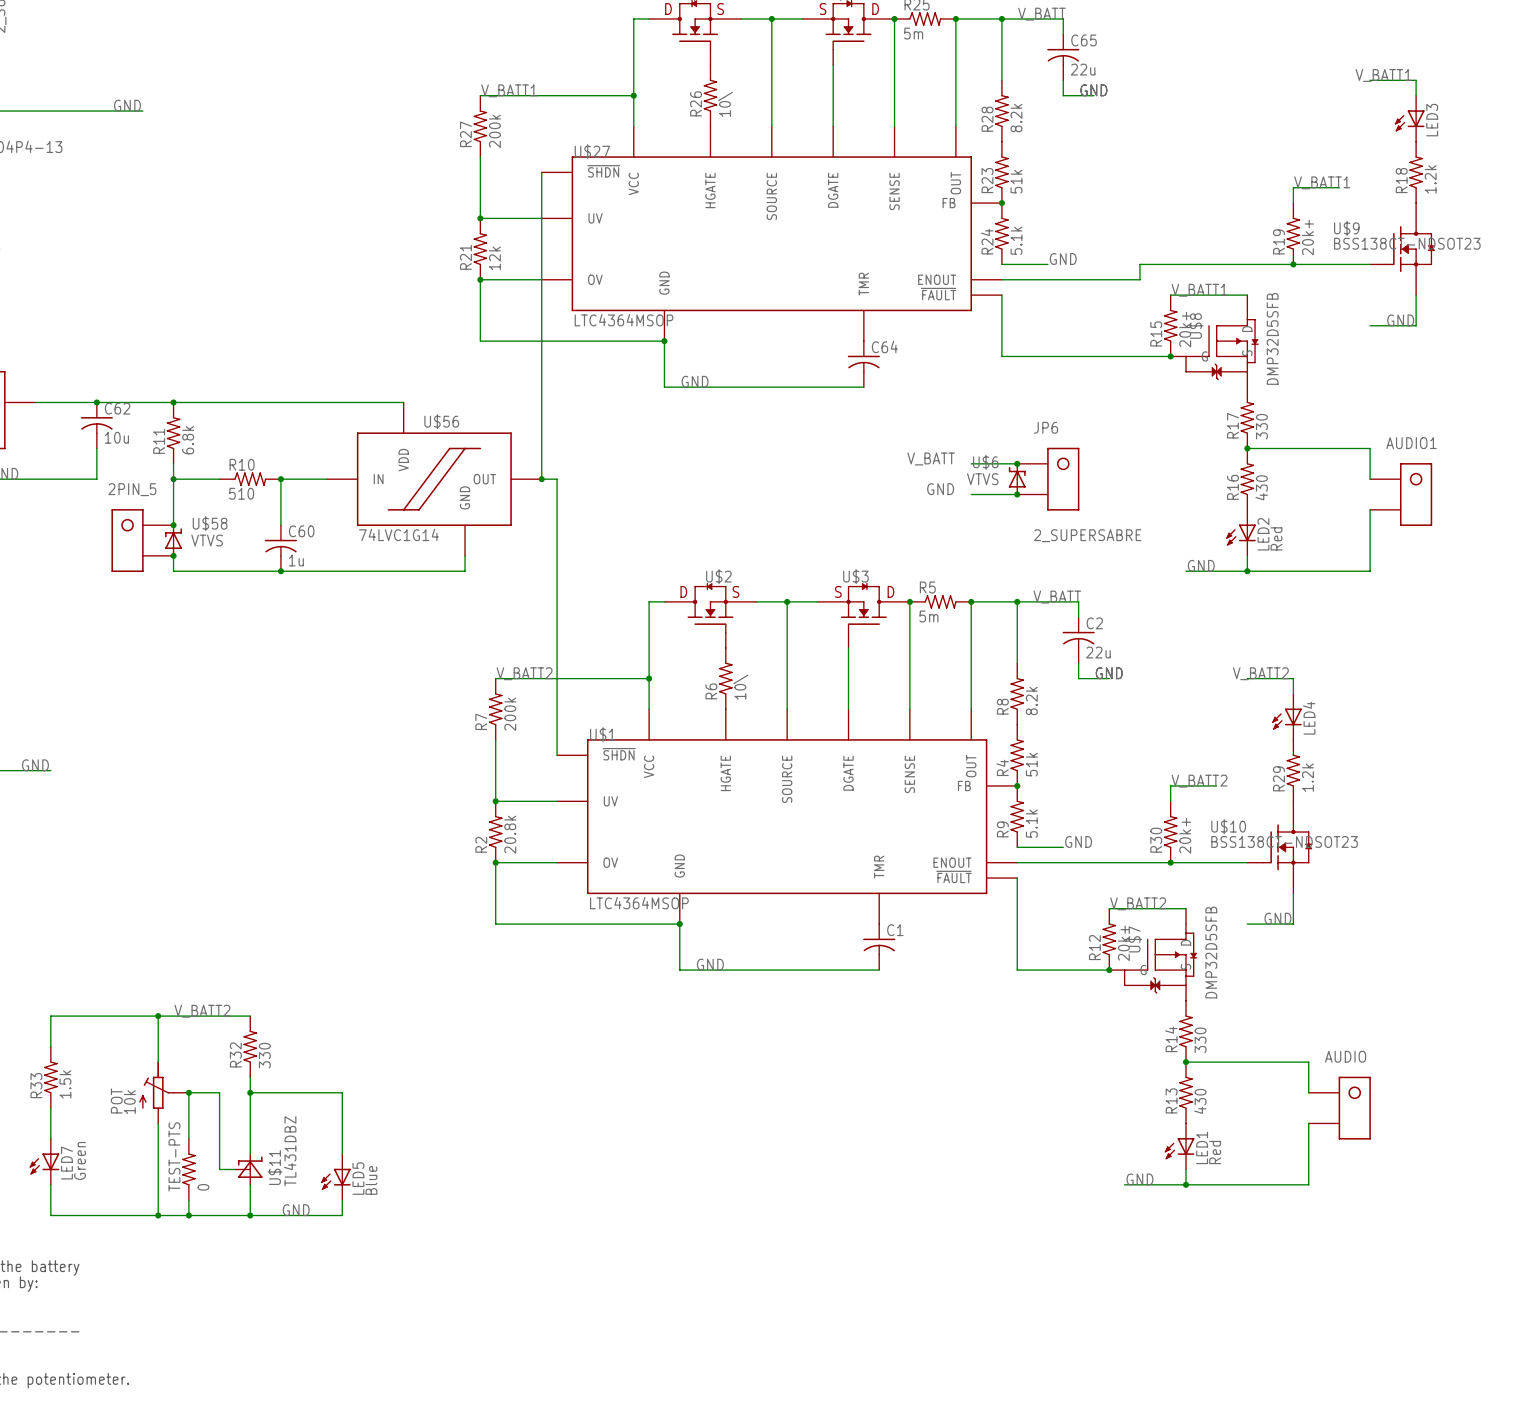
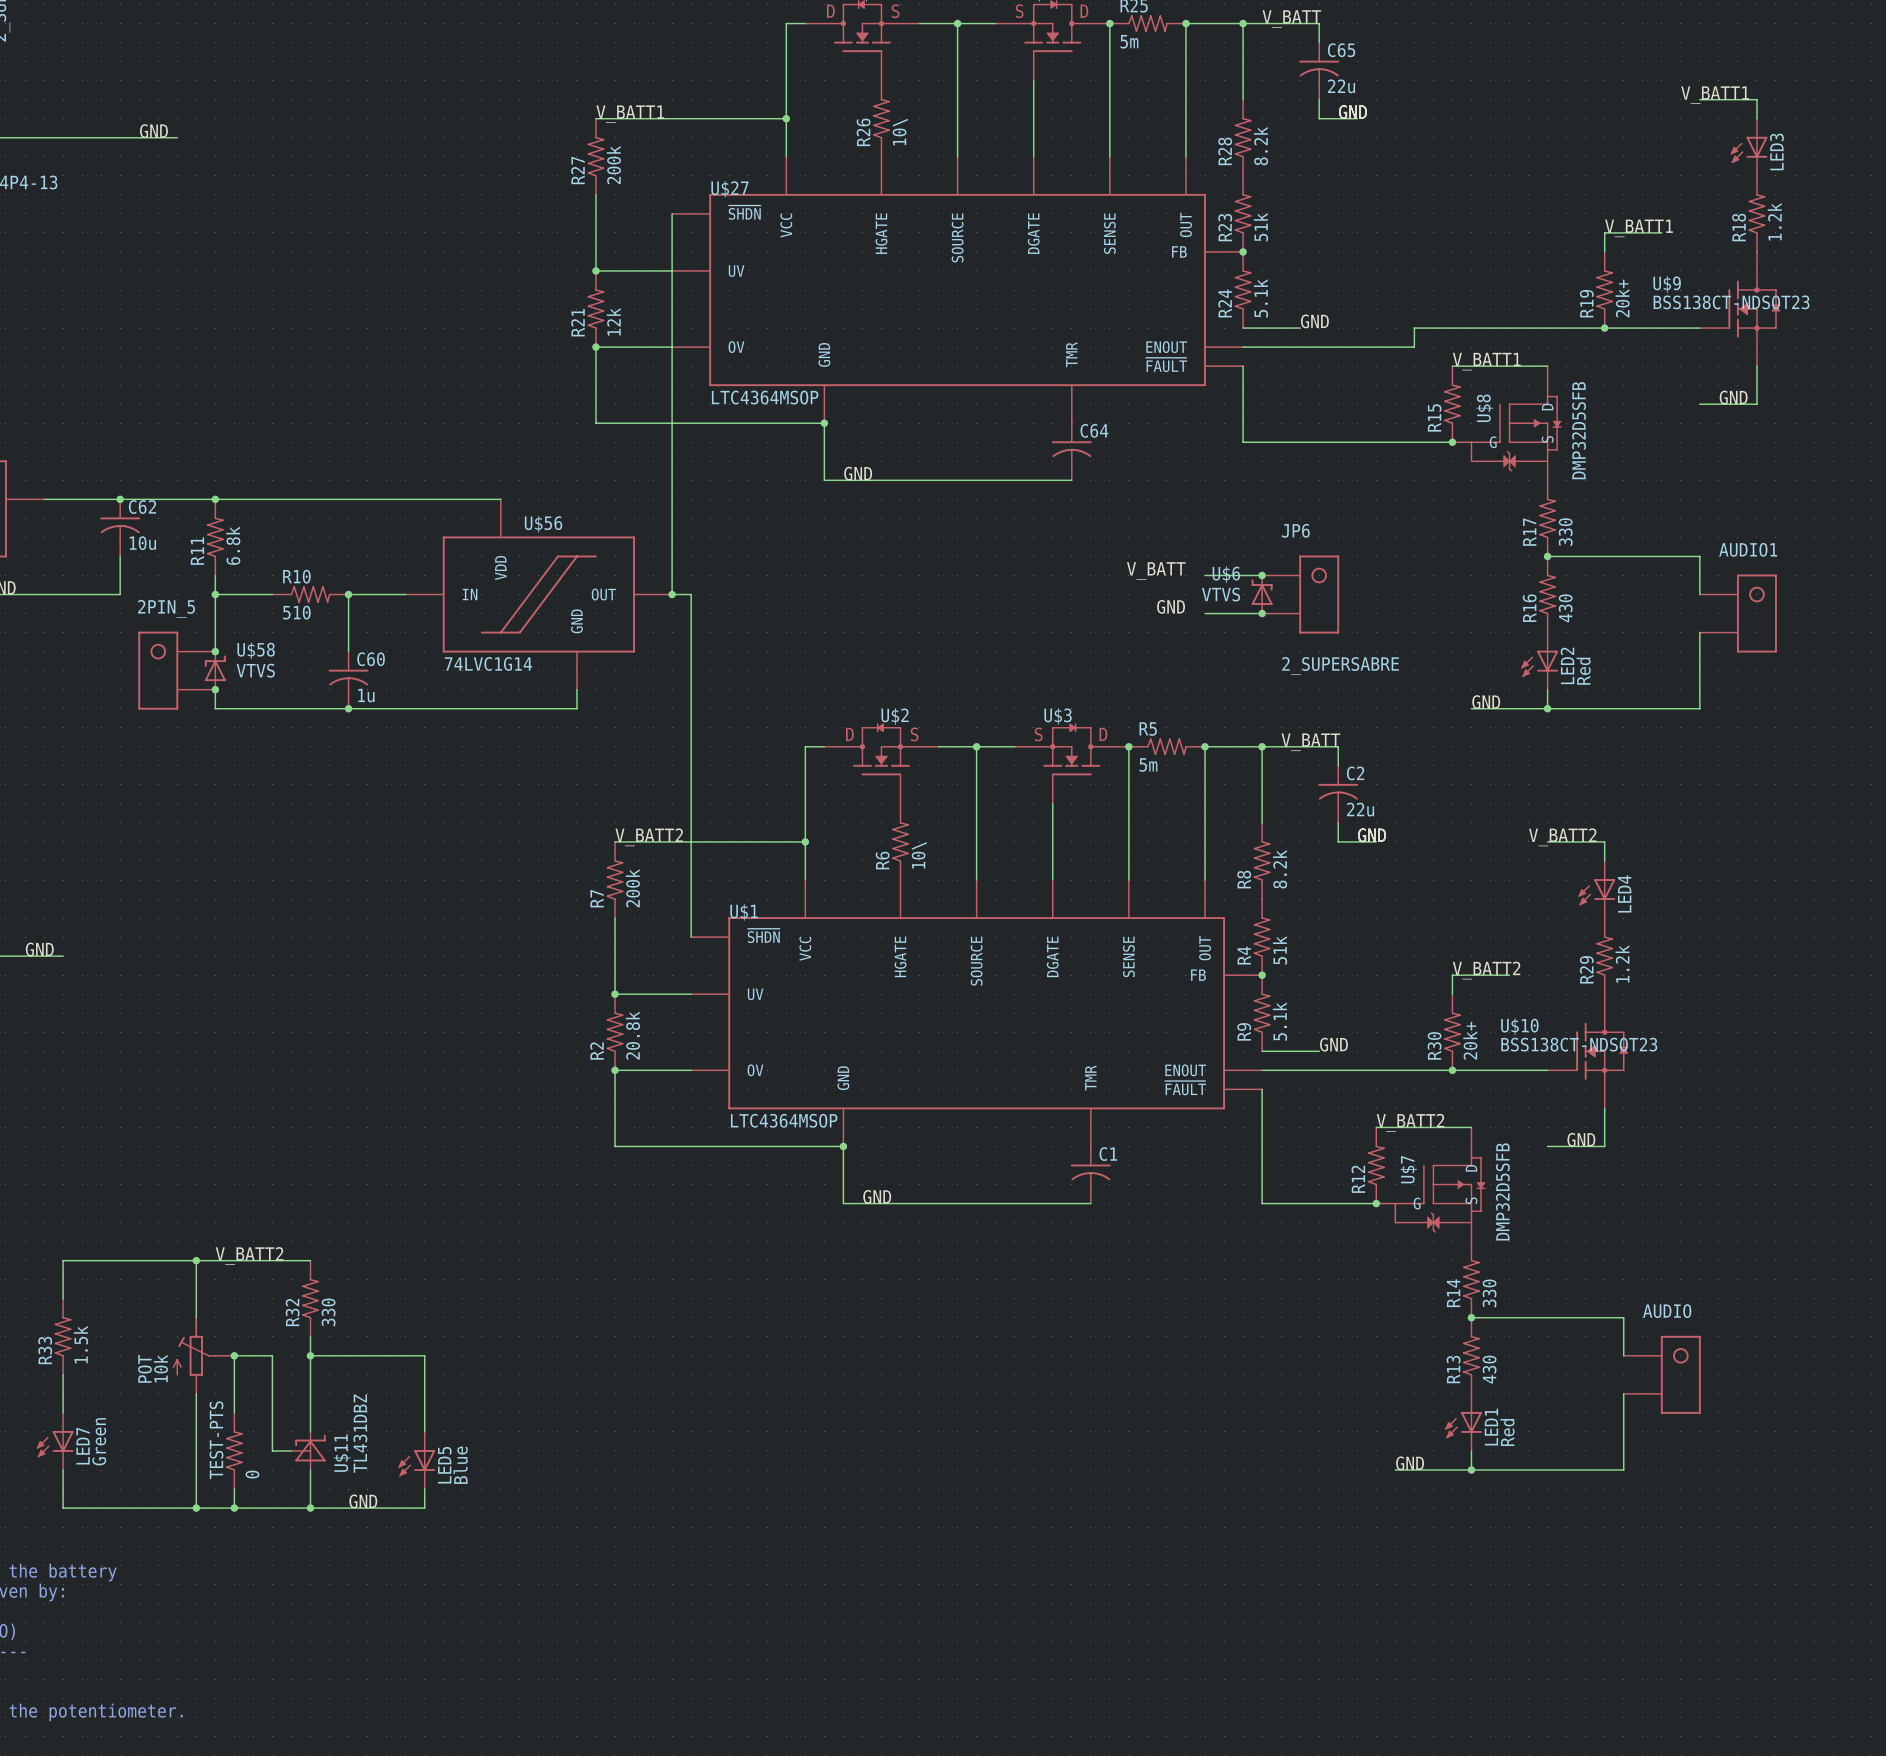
R15 value: 20k+ (1185, 329) -> none
R12 value: 20k+ (1123, 943) -> none

